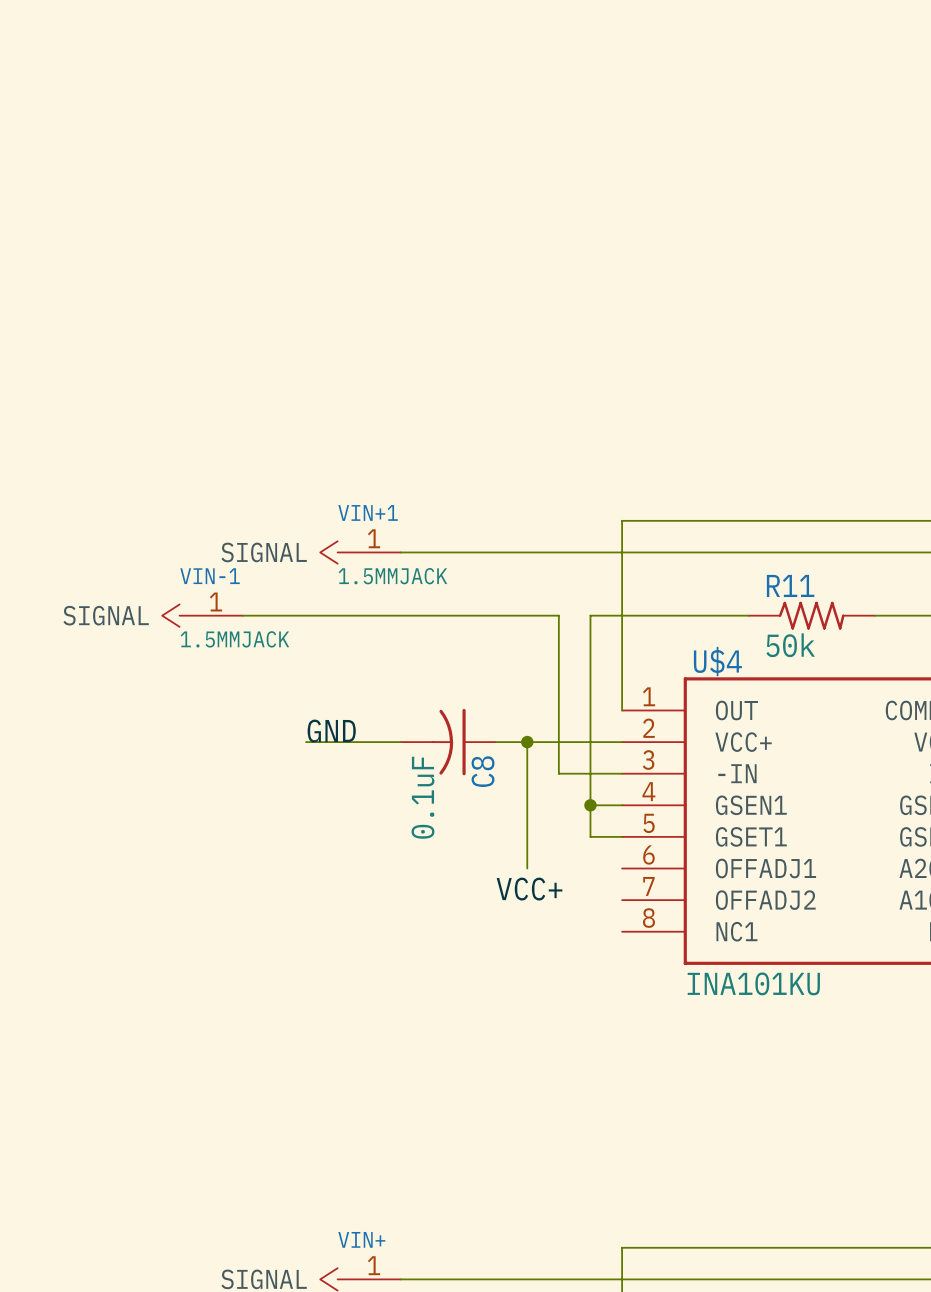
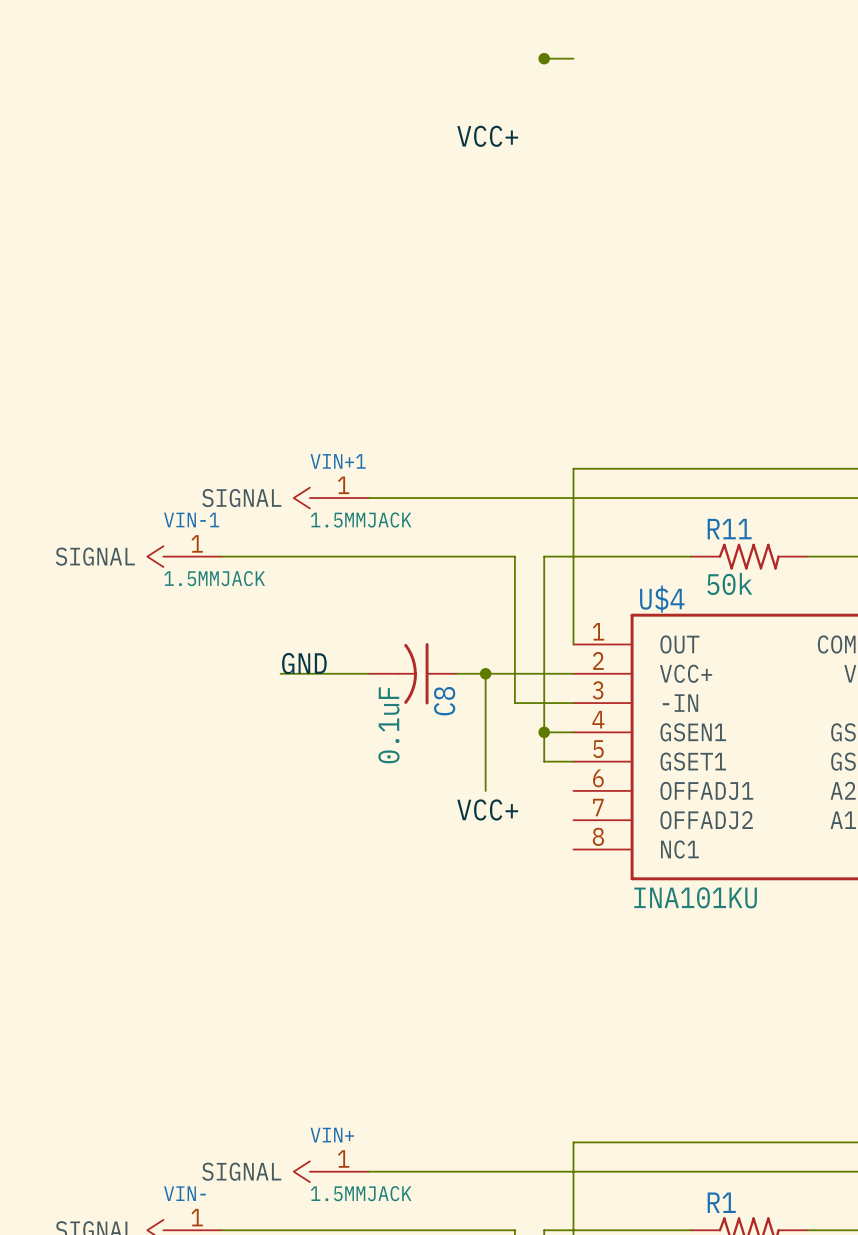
wire: none -> (544, 58) (573, 58)
junction: none -> (544, 58)
label: none -> VCC+ (487, 136)

